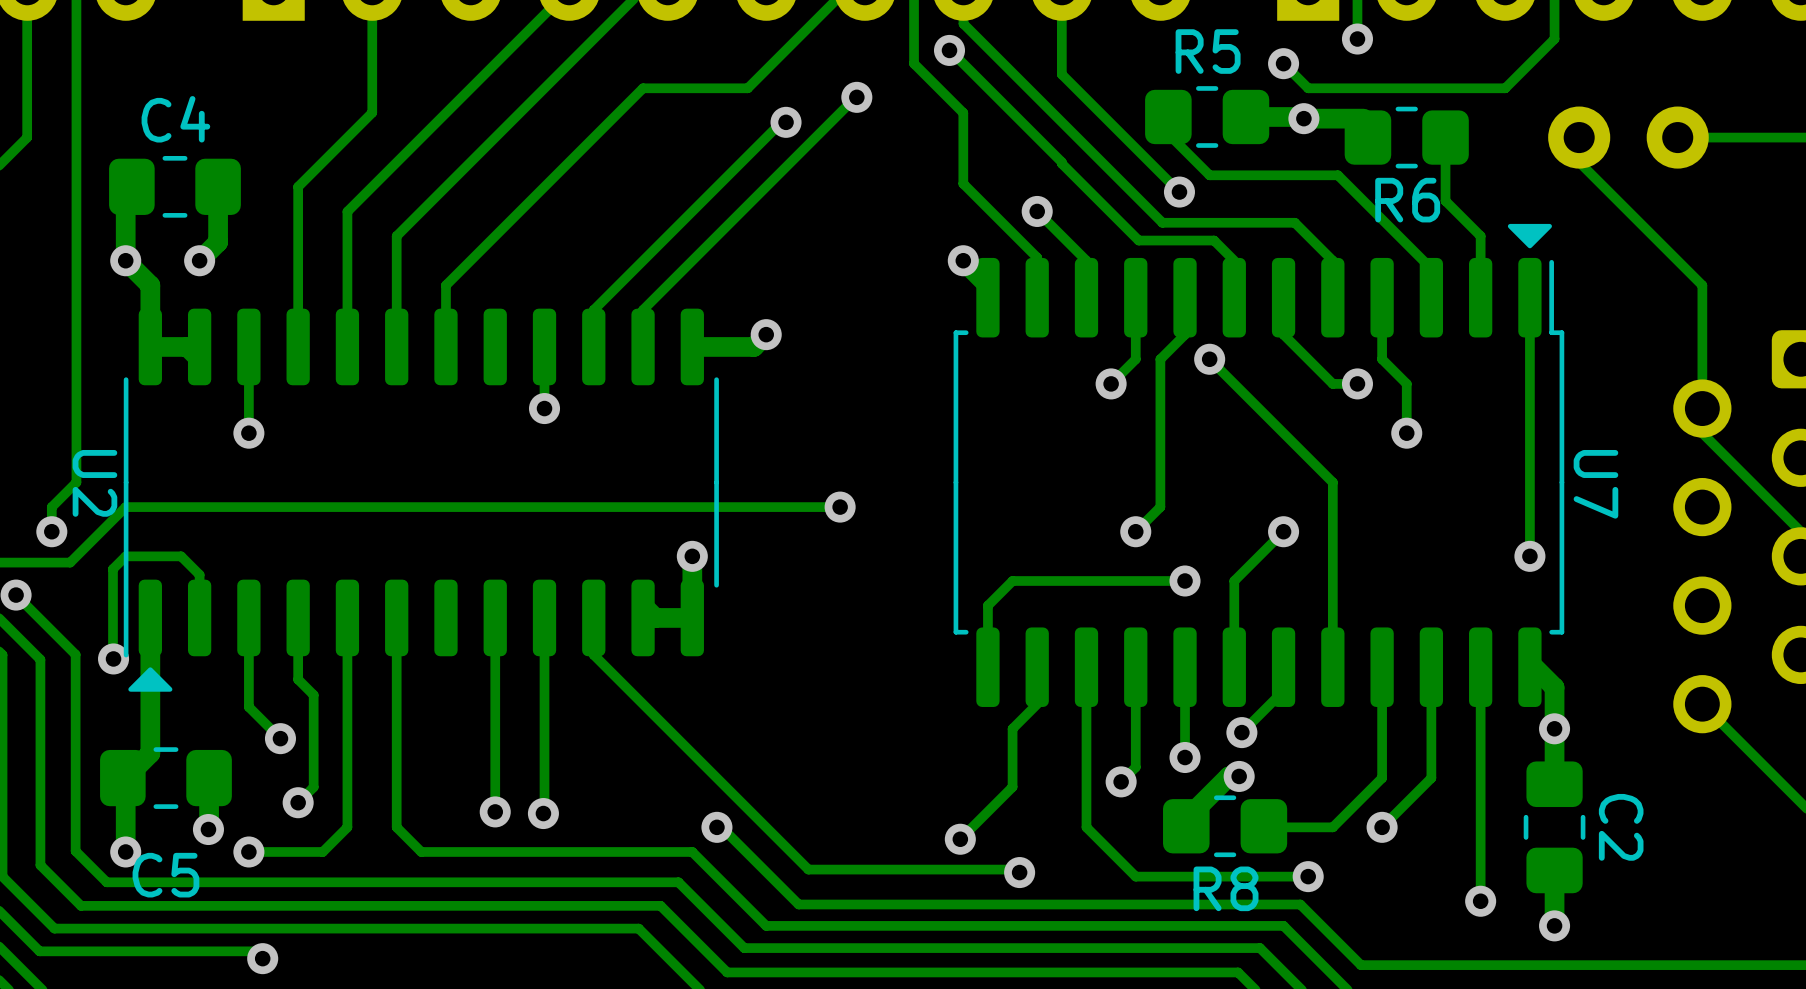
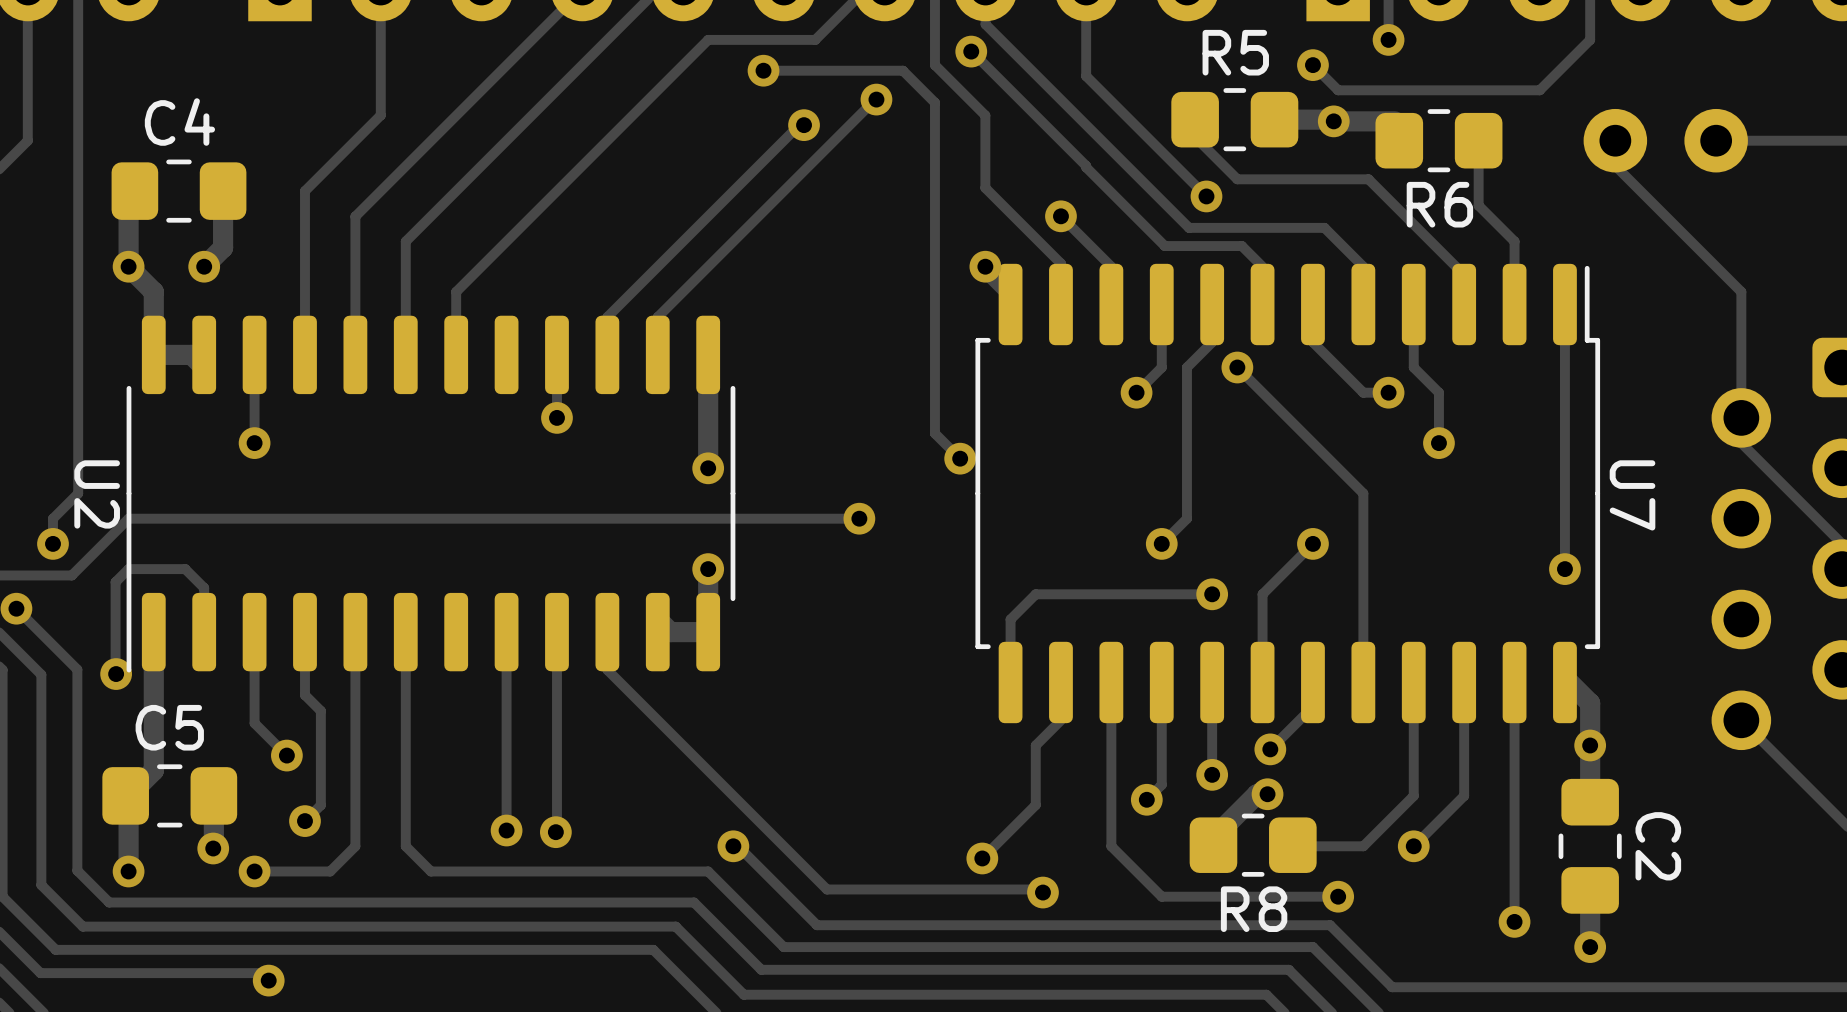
track: (797, 39) (747, 88) (643, 88) -> (815, 39) (708, 39) (657, 90)
track: none -> (763, 70) (902, 70) (934, 102) (934, 433) (960, 458)
via: none -> (763, 70)
U7 footprint: [953, 223, 1565, 707] -> [975, 263, 1601, 724]
U2 footprint: [123, 308, 719, 692] -> [126, 315, 736, 673]
track: (766, 334) (753, 346) (692, 346) -> (708, 468) (708, 354)
via: (766, 334) -> none
via: none -> (960, 458)
via: none -> (708, 468)
C5 name position: C5 (165, 875) -> C5 (169, 727)

